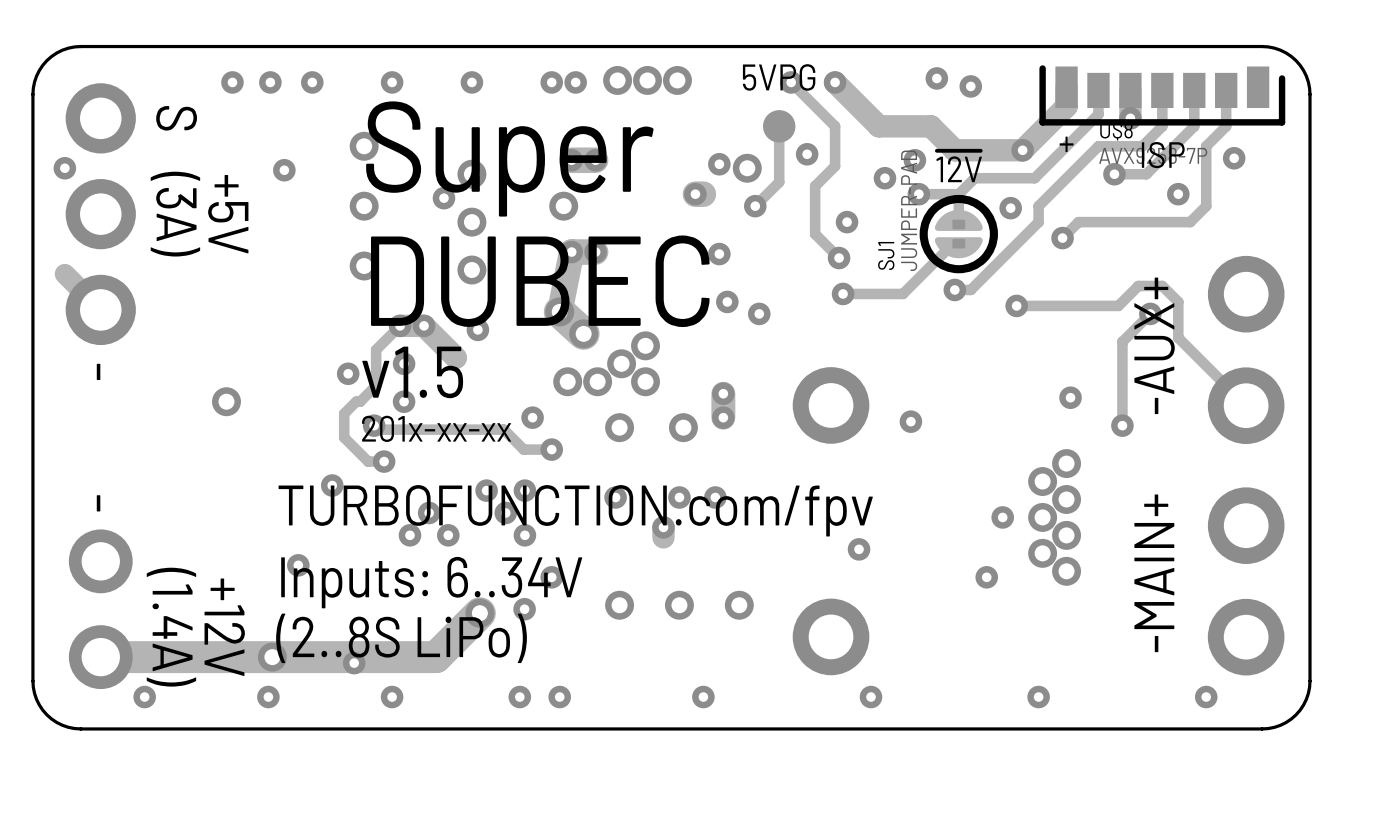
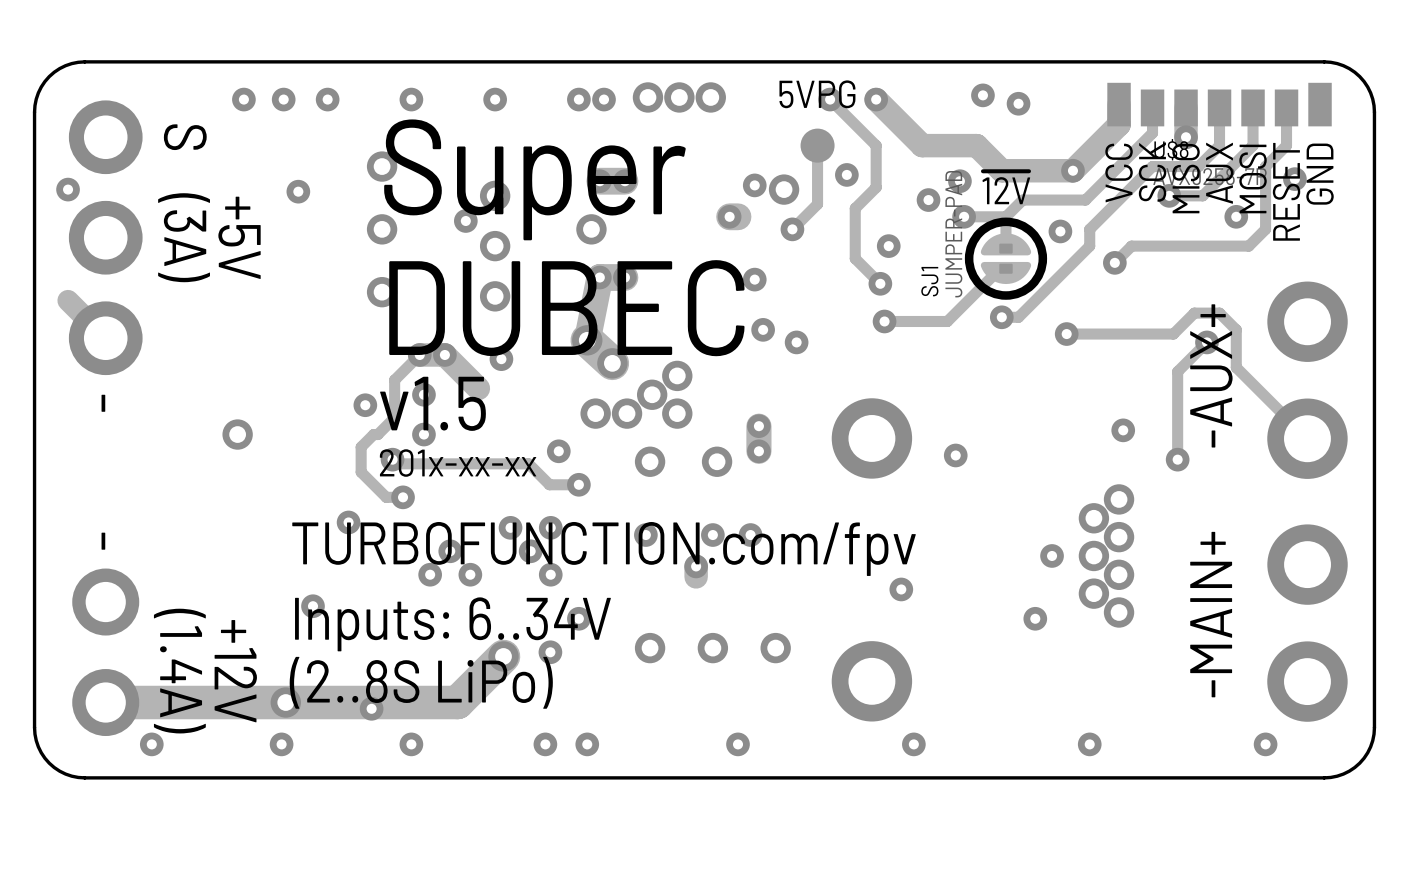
line: (1042, 68) (1042, 122) (1282, 122) (1282, 78) -> none
text: + (1066, 144) -> VCC (1119, 173)
text: none -> SCK (1152, 172)
text: none -> AUX (1219, 173)
text: none -> GND (1320, 174)
text: ISP (1163, 155) -> none
text: none -> MISO (1186, 178)
text: none -> MOSI (1253, 178)
text: none -> RESET (1286, 191)

